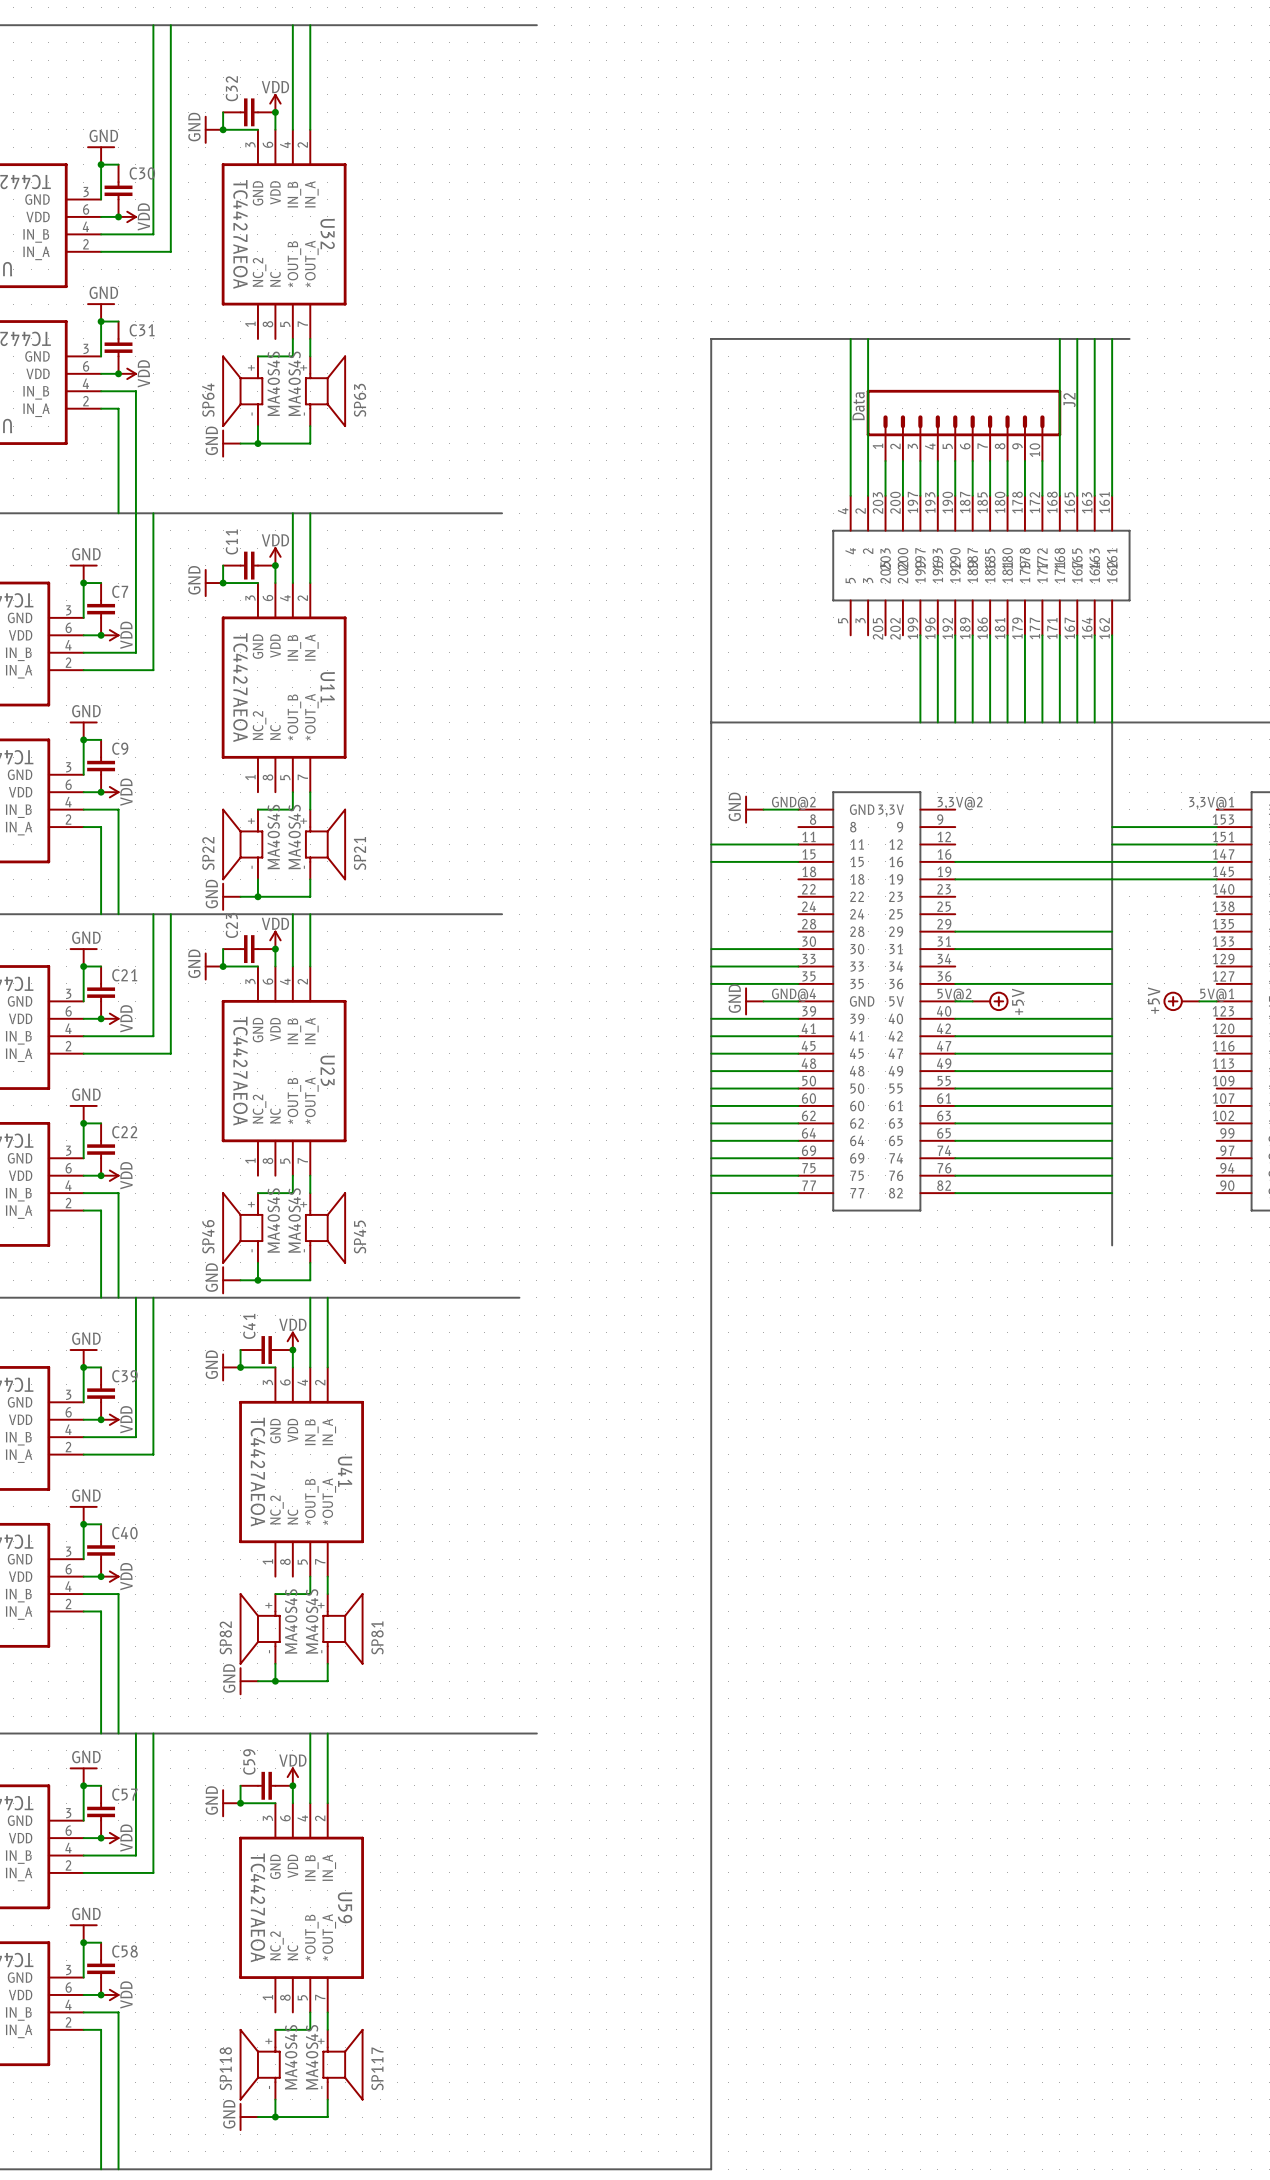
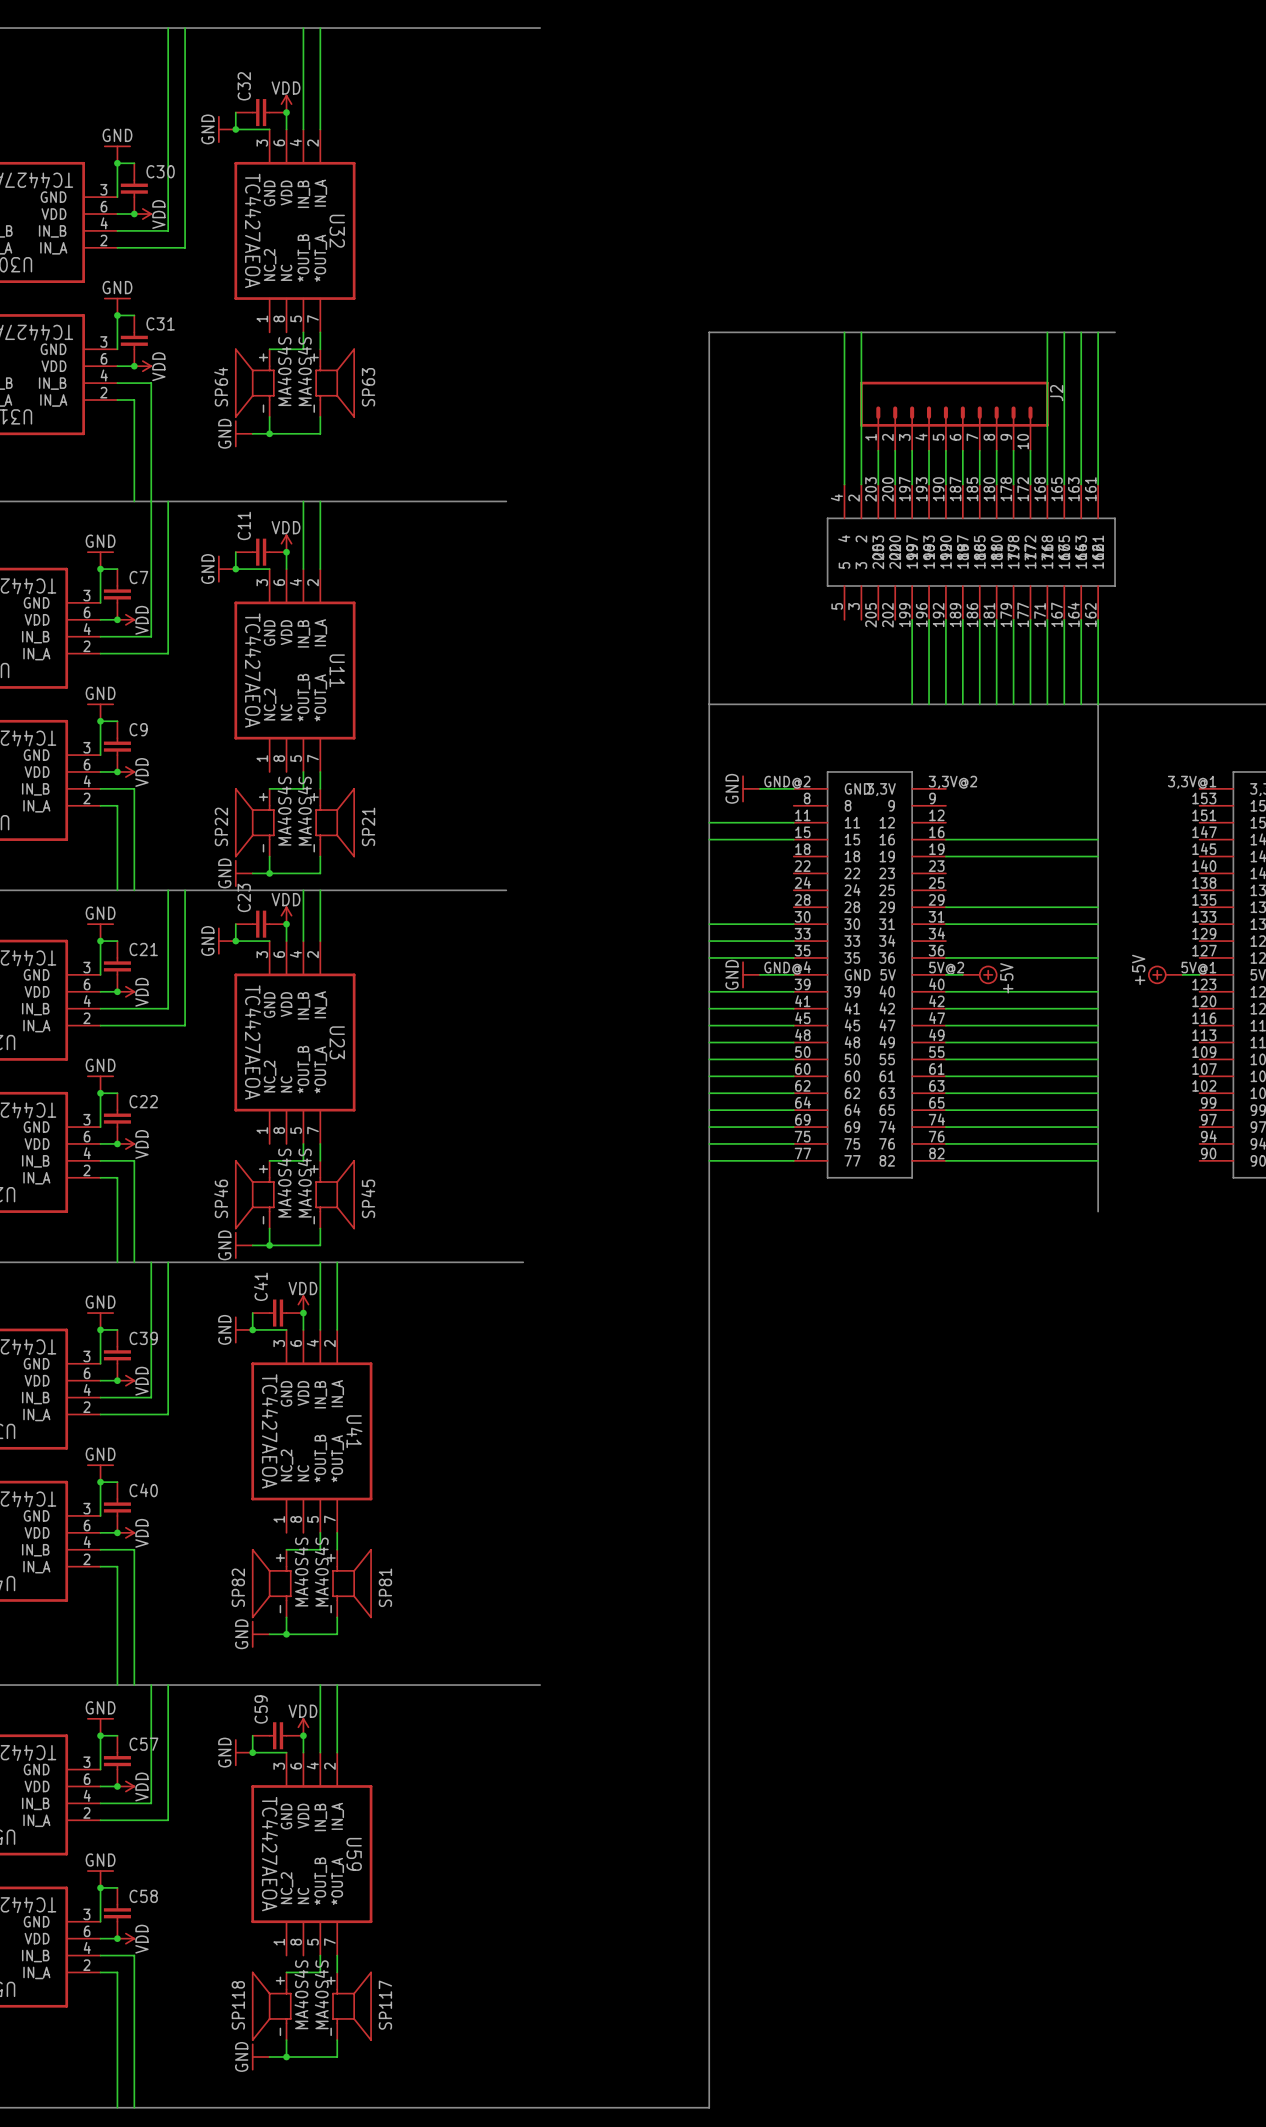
J2 value: Data (858, 406) -> none
wire: (1112, 827) (1216, 827) -> none
wire: (1112, 844) (1216, 844) -> none
wire: (1112, 861) (1216, 861) -> none
wire: (1112, 879) (1216, 879) -> none

